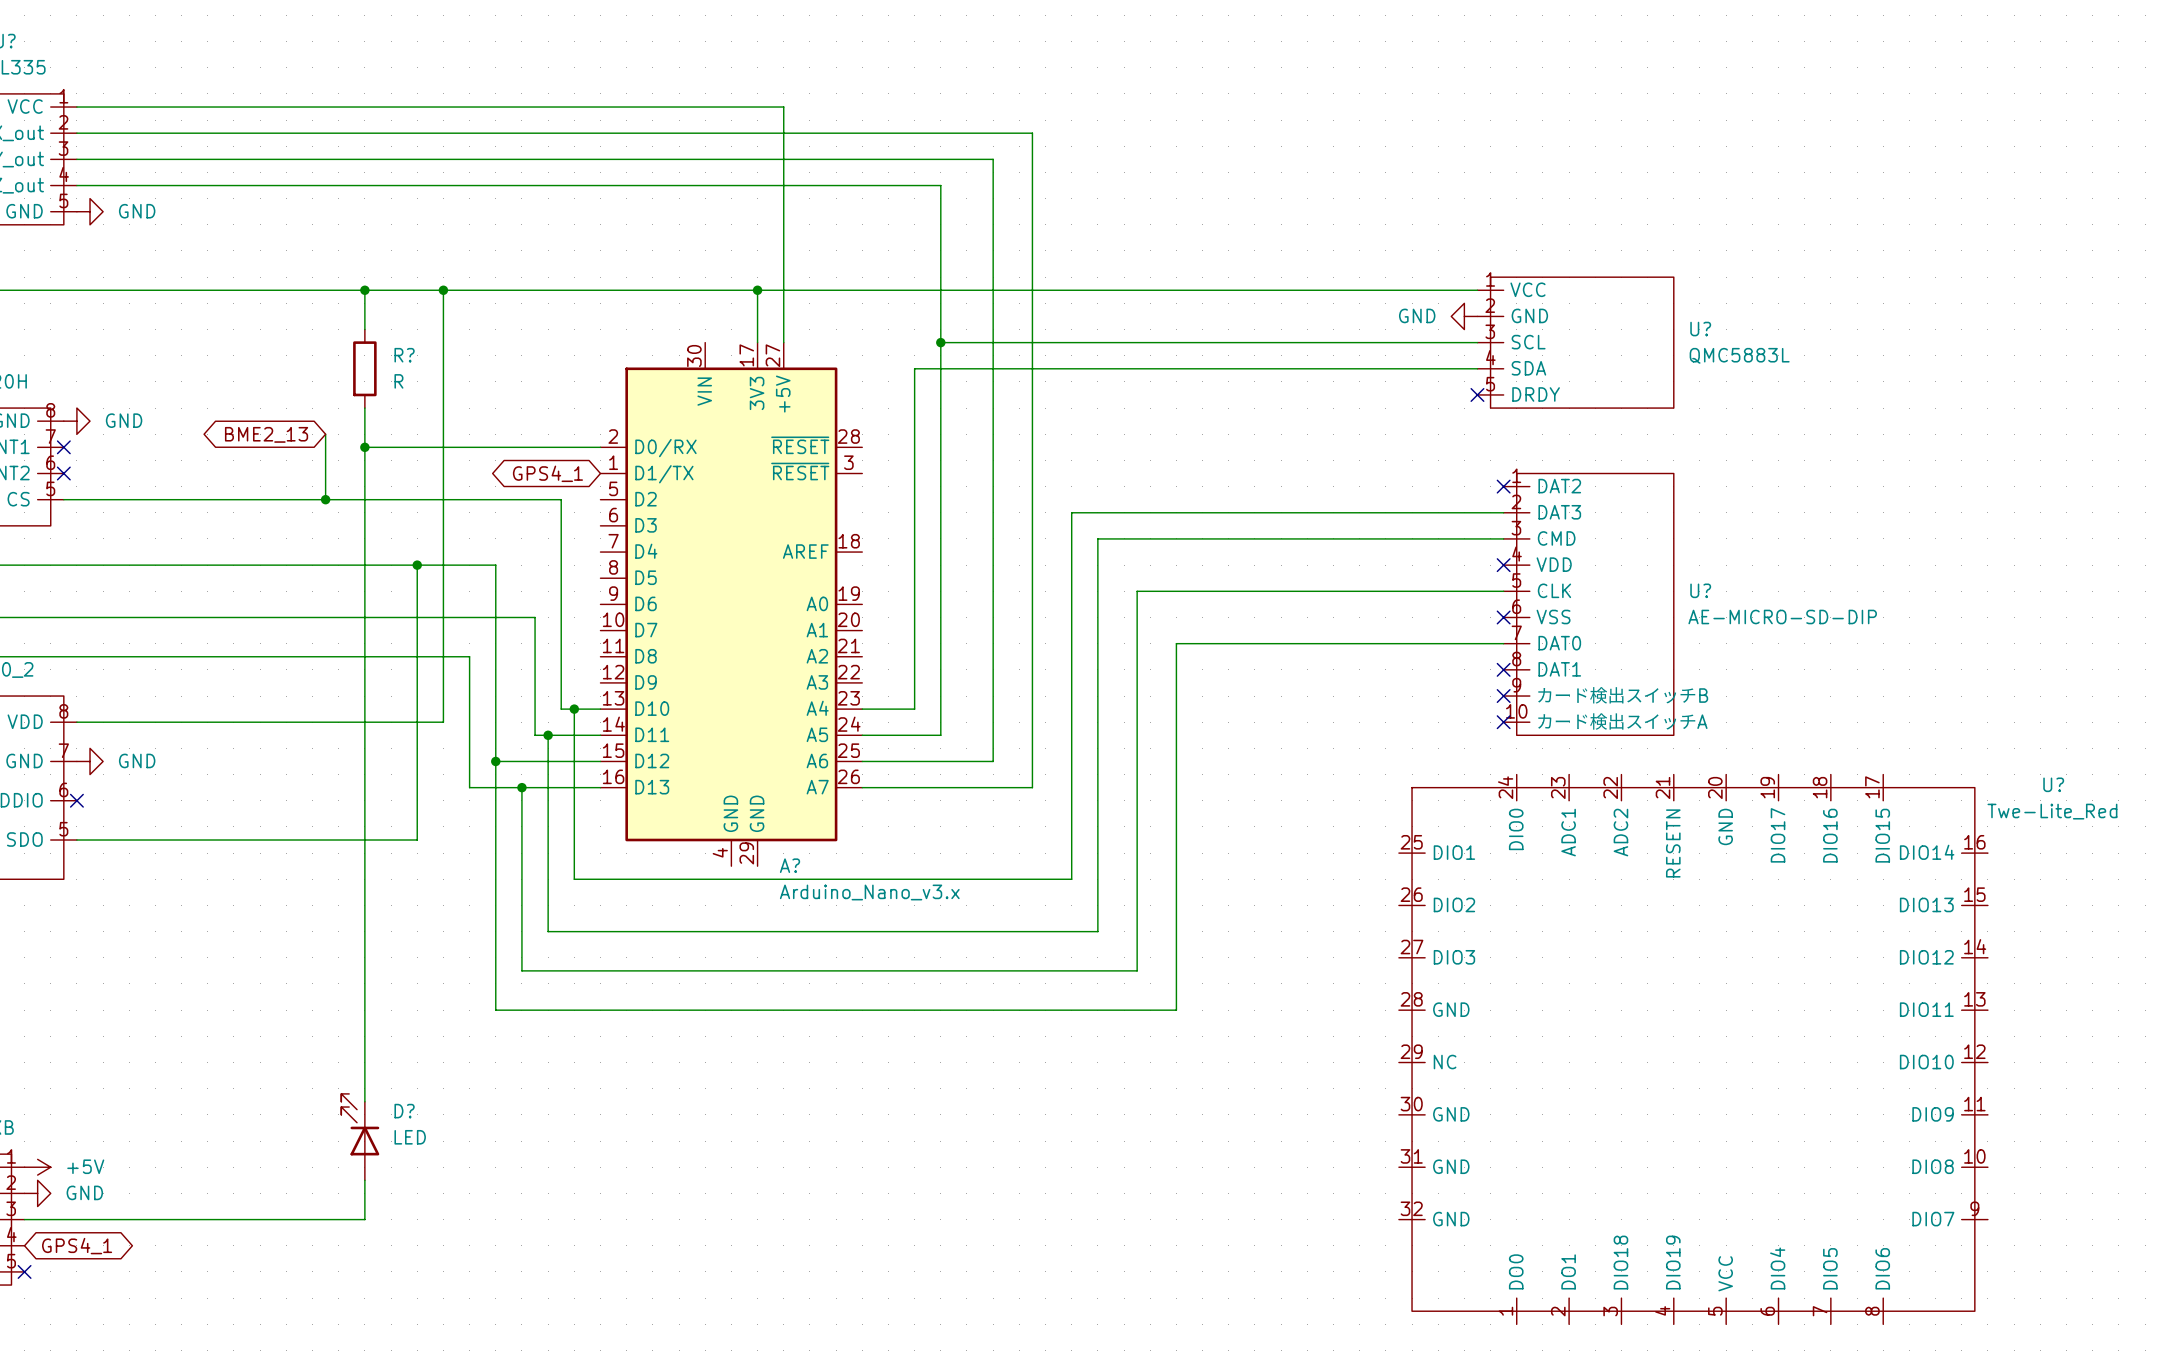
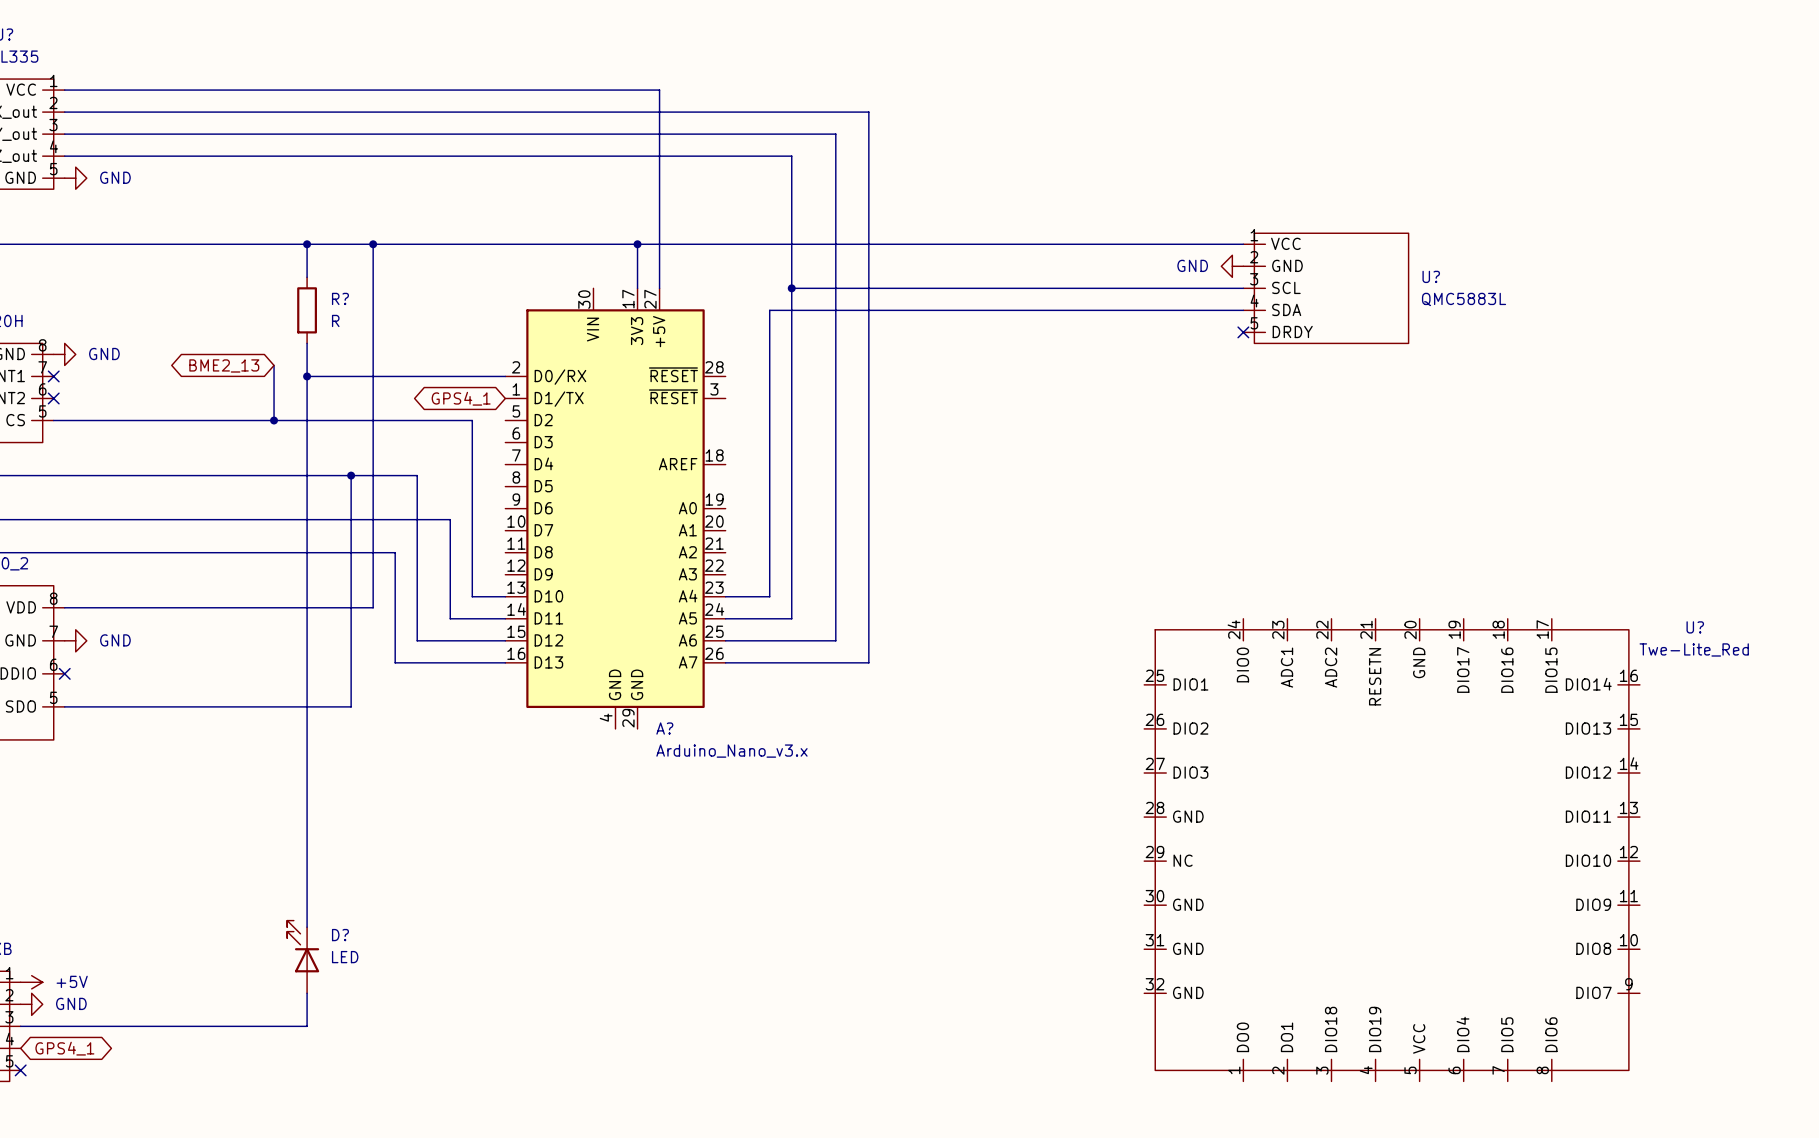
no-connect mark: (1503, 486) -> none
wire: (1503, 512) (1071, 512) (1071, 879) (574, 879) (574, 709) -> none
wire: (1503, 538) (1097, 538) (1097, 931) (548, 931) (548, 735) -> none
no-connect mark: (1503, 565) -> none
wire: (1503, 591) (1137, 591) (1137, 970) (521, 970) (521, 787) -> none
U?: AE-MICRO-SD-DIP (1588, 604) -> none
no-connect mark: (1503, 617) -> none
wire: (1503, 643) (1176, 643) (1176, 1010) (495, 1010) (495, 761) -> none
no-connect mark: (1503, 669) -> none
no-connect mark: (1503, 696) -> none
junction: (574, 709) -> none
no-connect mark: (1503, 722) -> none
junction: (548, 735) -> none
junction: (495, 761) -> none
junction: (521, 787) -> none
U? position: (1693, 1049) -> (1392, 850)

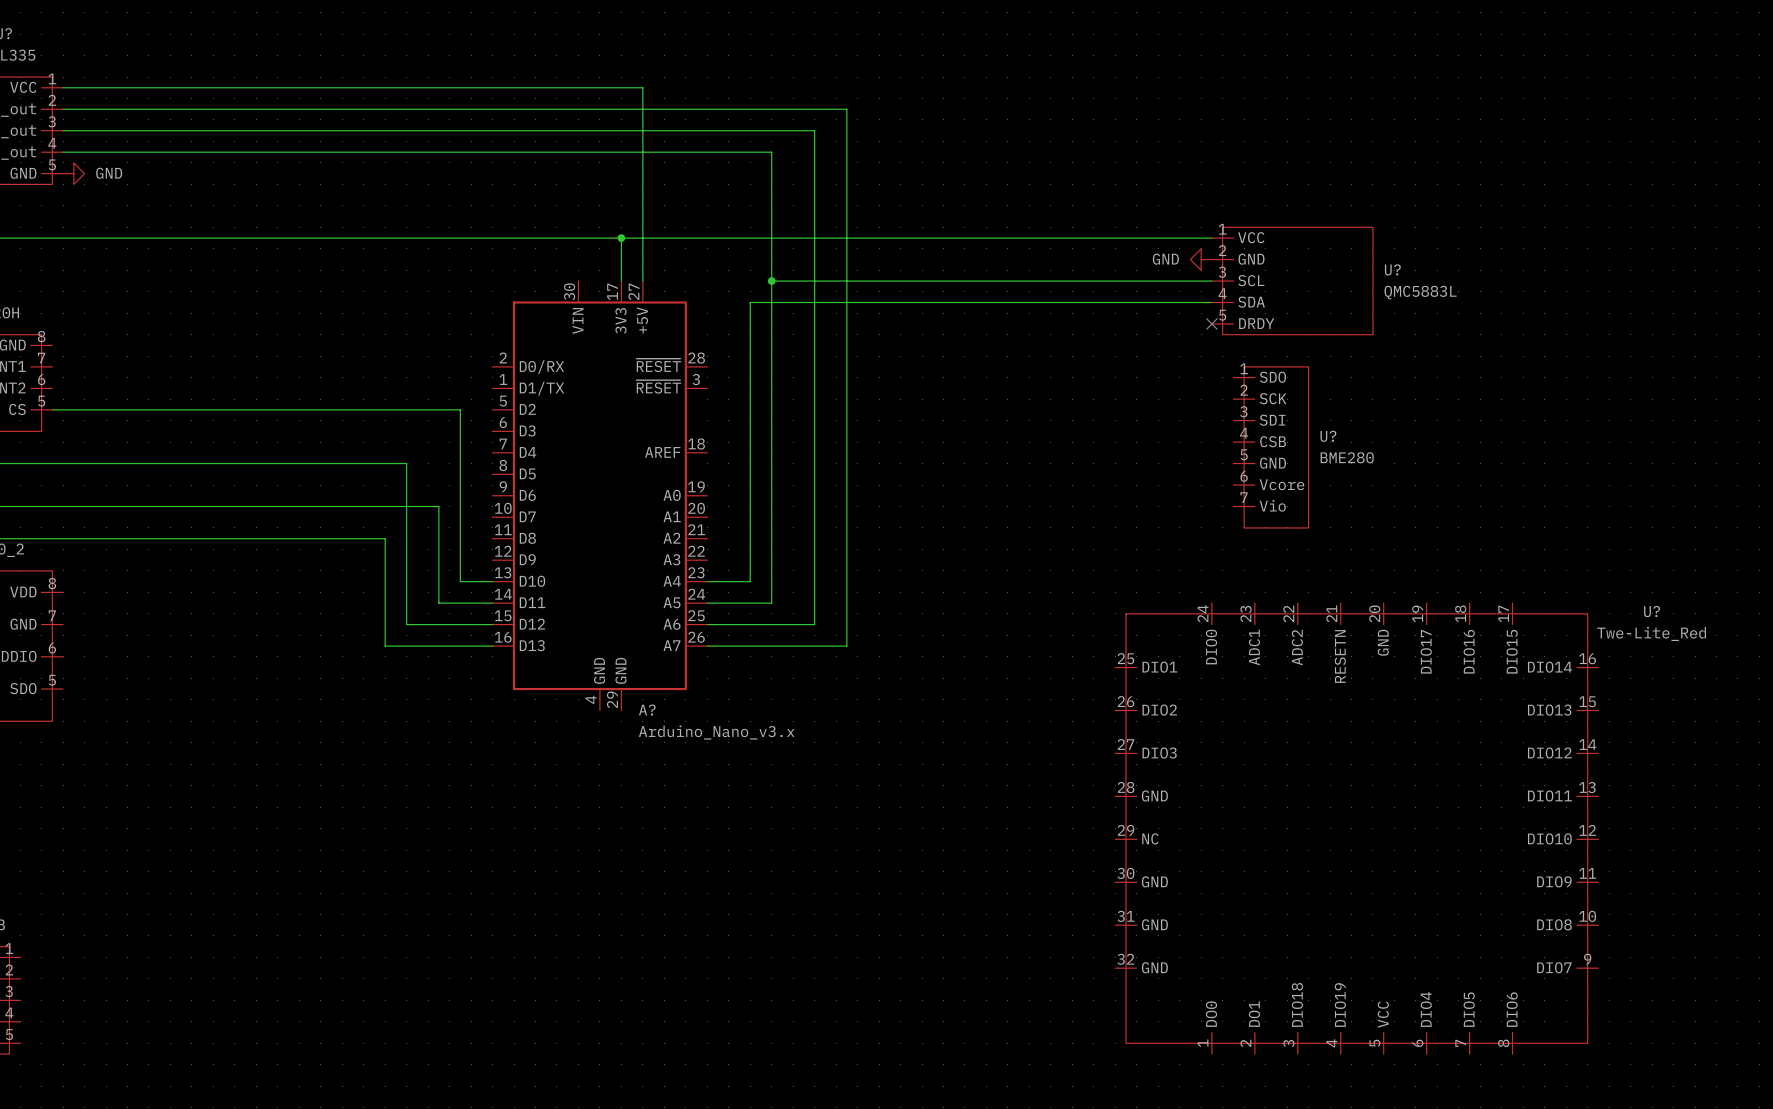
wire: (307, 244) (307, 277) -> none
junction: (307, 244) -> none
wire: (373, 244) (373, 607) (64, 607) -> none
junction: (373, 244) -> none
R?: R (307, 310) -> none
wire: (307, 343) (307, 927) -> none
power symbol: GND (64, 354) -> none
global label: BME2_13 (224, 365) -> none
wire: (274, 365) (274, 420) -> none
no-connect mark: (53, 376) -> none
wire: (307, 376) (505, 376) -> none
junction: (307, 376) -> none
no-connect mark: (53, 398) -> none
global label: GPS4_1 (461, 398) -> none
junction: (274, 420) -> none
U?: none -> BME280 (1270, 447)
wire: (351, 475) (351, 706) (64, 706) -> none
junction: (351, 475) -> none
power symbol: GND (75, 640) -> none
no-connect mark: (64, 673) -> none
D?: LED (303, 956) -> none
power symbol: +5V (31, 982) -> none
wire: (307, 993) (307, 1026) (20, 1026) -> none
power symbol: GND (31, 1004) -> none
global label: GPS4_1 (64, 1048) -> none
no-connect mark: (20, 1070) -> none

